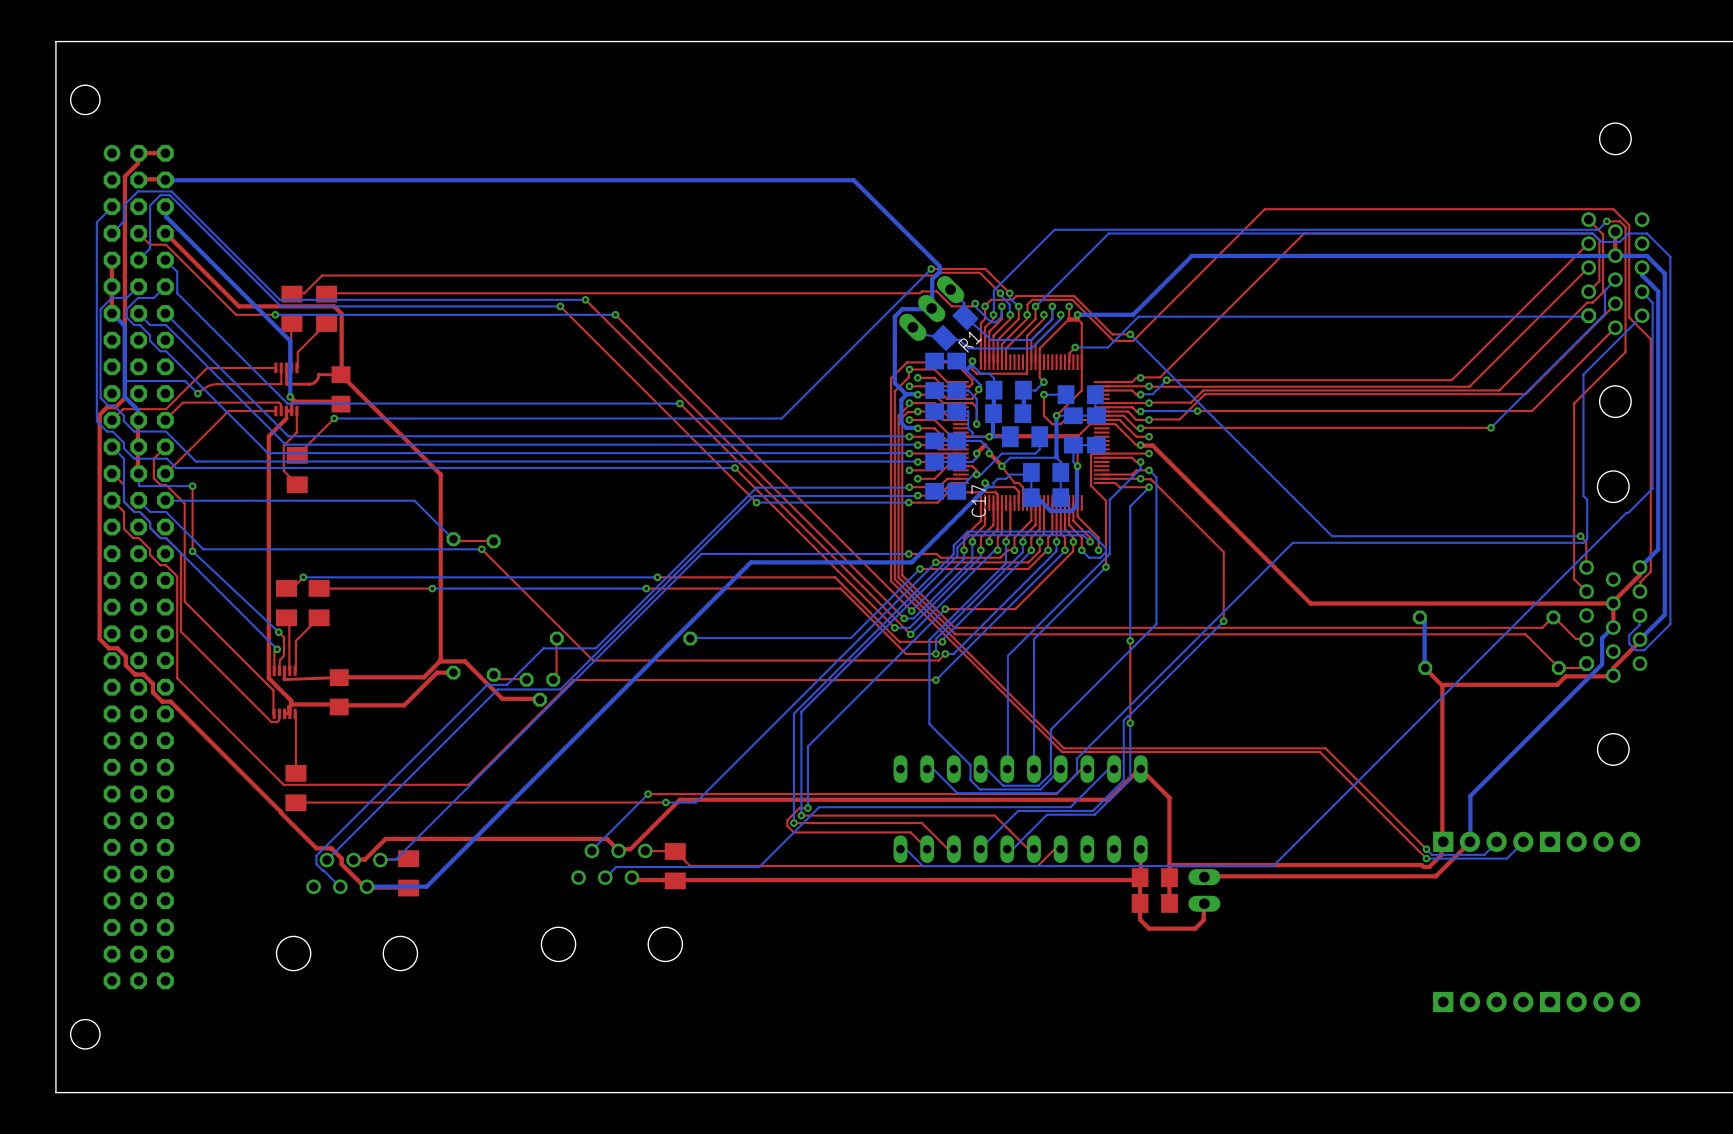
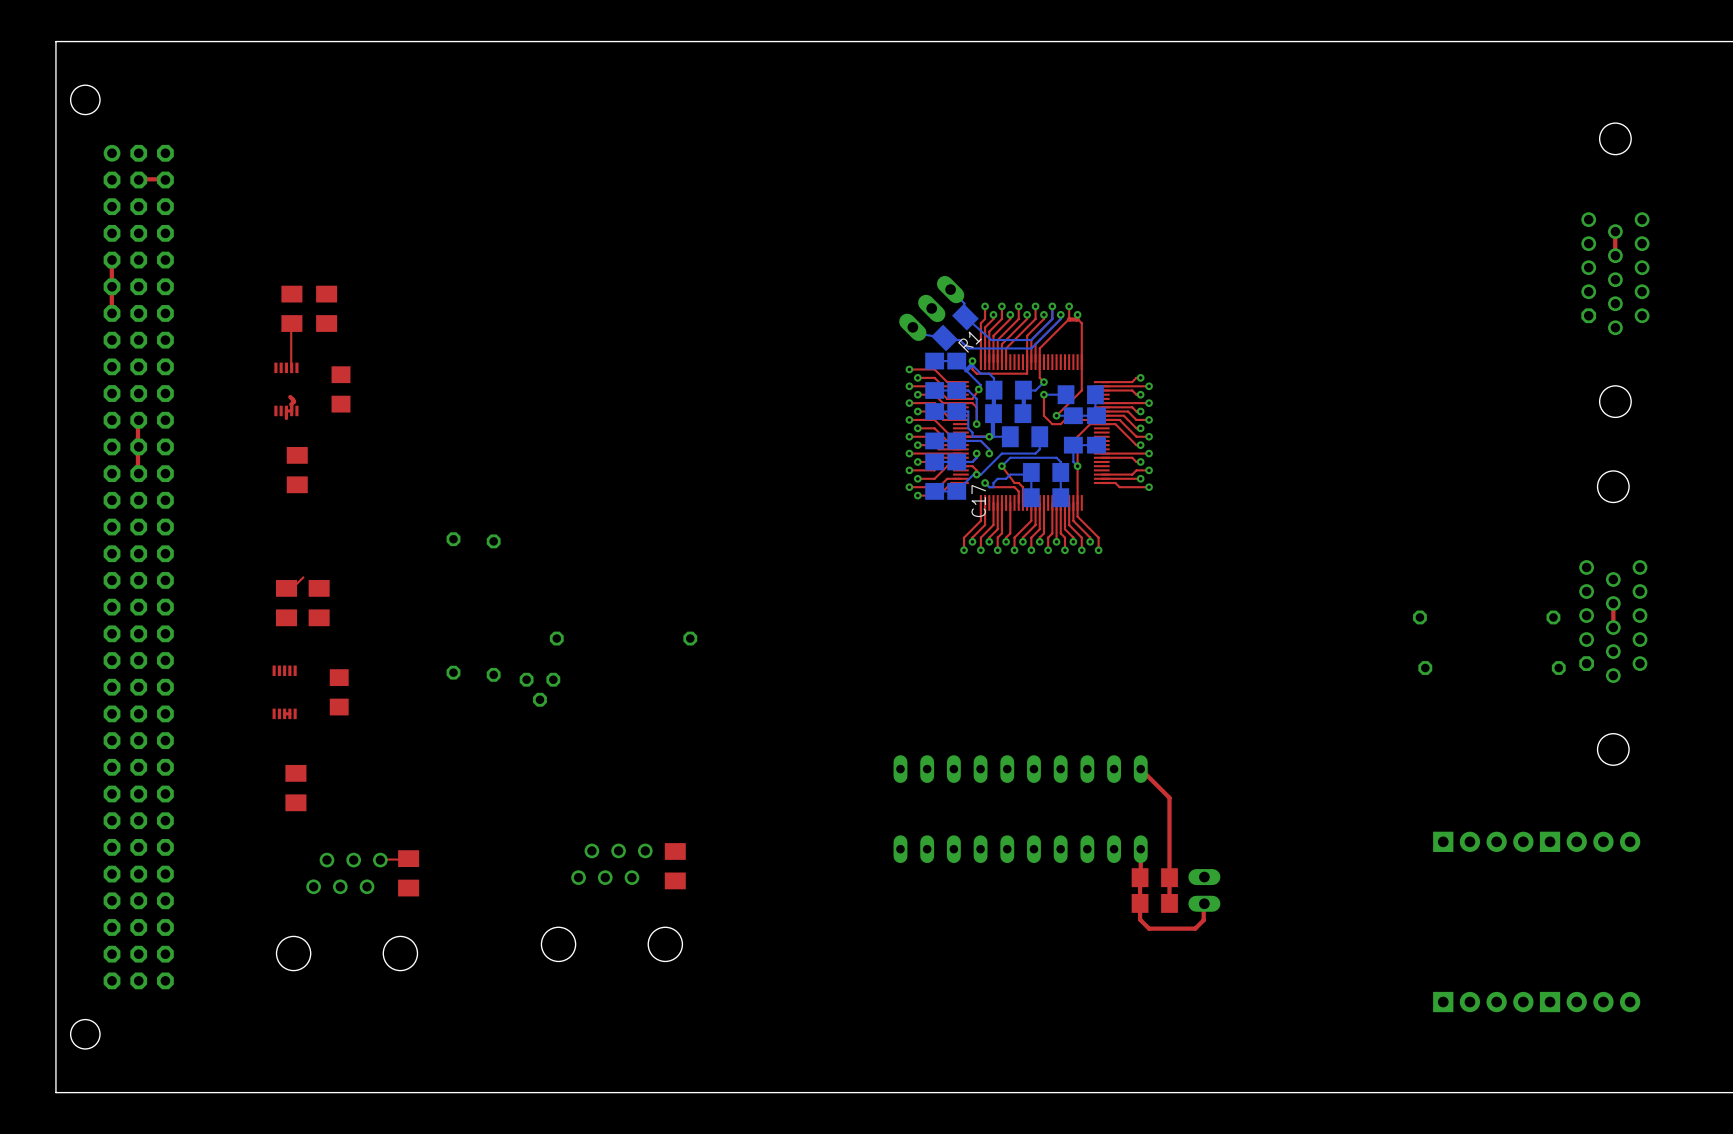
top track: (165, 153) (138, 153) (137, 163) (124, 176) (124, 397) (115, 407) (107, 407) (99, 414) (99, 639) (109, 648) (117, 648) (125, 656) (125, 665) (135, 674) (143, 674) (152, 683) (152, 692) (162, 701) (170, 701) (316, 848) (331, 848) (341, 858) (341, 864) (365, 887) (408, 888) -> none
bottom track: (165, 179) (853, 180) (939, 266) (939, 271) (932, 279) (931, 309) (902, 309) (894, 316) (894, 383) (906, 394) -> none
bottom track: (112, 206) (96, 222) (96, 421) (107, 431) (112, 431) (123, 442) (123, 448) (134, 458) (166, 458) (176, 468) (735, 468) -> none
bottom track: (165, 206) (166, 216) (290, 340) (290, 397) -> none
top track: (1588, 219) (1603, 234) (1603, 292) (1592, 302) (1587, 302) (1499, 390) (1203, 390) (1191, 402) (1149, 403) -> none
top track: (1606, 221) (1619, 221) (1625, 226) (1625, 352) (1574, 403) (1574, 579) (1586, 591) -> none
bottom track: (1606, 221) (1598, 229) (1054, 229) (993, 290) (993, 314) -> none
via: (1606, 221) -> none
bottom track: (112, 233) (123, 221) (123, 205) (137, 191) (171, 191) (280, 299) (585, 299) -> none
top track: (138, 233) (150, 244) (166, 244) (236, 314) (275, 314) -> none
top track: (165, 233) (238, 306) (334, 306) (341, 313) (341, 374) -> none
top track: (1588, 243) (1451, 380) (1166, 380) -> none
bottom track: (138, 260) (150, 248) (150, 205) (160, 195) (169, 195) (280, 306) (560, 306) -> none
bottom track: (165, 260) (177, 271) (177, 293) (287, 403) (679, 403) -> none
top track: (1588, 267) (1469, 386) (1149, 386) -> none
bottom track: (1642, 267) (1642, 275) (1658, 291) (1658, 549) (1640, 567) -> none
top track: (931, 269) (985, 269) (1009, 293) -> none
bottom track: (931, 269) (781, 418) (334, 418) -> none
via: (931, 269) -> none
bottom track: (1615, 279) (1604, 290) (1604, 313) (1490, 427) -> none
bottom track: (138, 286) (126, 297) (111, 297) (100, 309) (100, 397) (108, 405) (113, 405) (123, 415) (123, 421) (134, 431) (166, 431) (195, 461) (917, 461) -> none
bottom track: (165, 286) (153, 297) (137, 297) (126, 309) (126, 317) (134, 325) (139, 325) (150, 335) (150, 340) (160, 351) (166, 351) (267, 453) (909, 453) -> none
top track: (1588, 291) (1599, 281) (1599, 240) (1592, 233) (1304, 233) (1160, 377) (1140, 377) -> none
bottom track: (1642, 291) (1652, 302) (1652, 488) (1273, 866) (922, 866) (906, 849) (900, 849) -> none
top track: (1000, 293) (979, 272) (940, 272) (937, 275) (322, 275) (304, 293) (291, 294) -> none
bottom track: (1000, 293) (1009, 304) (1010, 314) -> none
via: (1000, 293) -> none
bottom track: (1009, 293) (1009, 297) (1018, 306) -> none
via: (1009, 293) -> none
top track: (326, 294) (920, 293) (921, 291) (936, 291) (951, 306) (972, 306) (975, 303) -> none
top track: (585, 299) (904, 618) -> none
via: (585, 299) -> none
bottom track: (975, 303) (975, 306) (991, 322) (995, 322) (1001, 316) (1001, 306) -> none
via: (975, 303) -> none
top track: (1615, 303) (1525, 394) (1205, 394) (1179, 419) (1149, 419) -> none
top track: (560, 306) (756, 502) -> none
via: (560, 306) -> none
top track: (985, 306) (991, 299) (1012, 299) (1016, 296) (1074, 296) (1112, 334) (1130, 334) -> none
bottom track: (1035, 306) (1108, 233) (1592, 233) (1601, 241) (1619, 241) (1628, 233) (1647, 233) (1670, 256) (1670, 624) (1644, 650) (1635, 650) (1629, 643) (1629, 635) (1639, 625) (1640, 615) -> none
bottom track: (112, 313) (124, 326) (124, 397) (137, 410) (138, 420) -> none
bottom track: (138, 313) (150, 325) (166, 325) (285, 444) (917, 445) -> none
bottom track: (165, 313) (288, 436) (909, 436) -> none
via: (275, 314) -> none
top track: (615, 314) (911, 610) -> none
bottom track: (615, 314) (275, 314) -> none
via: (615, 314) -> none
top track: (1027, 314) (1027, 304) (1032, 299) (1072, 299) (1113, 340) (1133, 340) (1264, 209) (1613, 209) (1629, 225) (1629, 317) (1650, 339) (1650, 571) (1640, 582) (1640, 591) -> none
bottom track: (1077, 314) (1133, 314) (1191, 255) (1647, 255) (1664, 273) (1664, 614) (1640, 639) -> none
bottom track: (1588, 315) (1138, 316) (1107, 347) (1075, 347) -> none
bottom track: (1642, 315) (1583, 374) (1583, 496) (1587, 499) (1587, 539) (1583, 542) (1292, 542) (1077, 758) (1077, 773) (1057, 793) (957, 793) (934, 769) (927, 769) -> none
top track: (326, 323) (297, 352) (296, 367) -> none
top track: (1615, 327) (1532, 411) (1197, 411) -> none
bottom track: (1130, 334) (1332, 536) (1580, 536) -> none
via: (1130, 334) -> none
top track: (1075, 347) (1069, 353) (1069, 362) -> none
via: (1075, 347) -> none
top track: (275, 367) (207, 368) (166, 409) (123, 409) (112, 420) -> none
top track: (281, 367) (281, 384) (214, 384) (207, 386) (197, 393) -> none
top track: (286, 367) (286, 384) (310, 384) (316, 380) (318, 374) (341, 374) -> none
top track: (909, 369) (908, 377) (894, 391) (894, 579) (1063, 748) (1325, 748) (1426, 849) -> none
top track: (341, 374) (440, 474) (439, 661) -> none
bottom track: (1166, 380) (1152, 394) (1140, 394) -> none
via: (1166, 380) -> none
bottom track: (124, 381) (185, 381) (197, 393) -> none
top track: (960, 386) (969, 386) (972, 380) (954, 362) (906, 362) (891, 378) (891, 581) (1062, 752) (1319, 752) (1426, 858) -> none
via: (197, 393) -> none
bottom track: (906, 394) (917, 394) -> none
bottom track: (906, 394) (901, 399) (901, 423) (906, 427) (917, 428) -> none
via: (290, 397) -> none
top track: (294, 401) (338, 401) (341, 404) -> none
top track: (679, 403) (910, 634) -> none
via: (679, 403) -> none
top track: (909, 403) (898, 415) (898, 577) (955, 634) (1525, 634) (1558, 668) (1582, 667) (1586, 663) -> none
top track: (275, 410) (228, 411) (165, 473) -> none
top track: (281, 410) (279, 402) (182, 402) (165, 420) -> none
top track: (296, 411) (296, 432) (283, 445) (283, 470) (297, 484) -> none
top track: (917, 411) (907, 411) (902, 417) (902, 575) (954, 627) (1542, 627) (1553, 617) (1576, 639) (1586, 639) -> none
bottom track: (1197, 411) (1140, 411) -> none
via: (1197, 411) -> none
bottom track: (1056, 415) (1056, 457) -> none
top track: (286, 418) (268, 436) (268, 678) (291, 700) (292, 704) -> none
top track: (334, 418) (297, 455) -> none
via: (334, 418) -> none
top track: (1490, 427) (1140, 428) -> none
via: (1490, 427) -> none
top track: (1077, 436) (989, 436) -> none
top track: (985, 445) (976, 453) -> none
top track: (1140, 445) (1152, 445) (1310, 603) (1613, 603) (1639, 575) (1640, 567) -> none
bottom track: (112, 446) (123, 458) (123, 501) (134, 511) (139, 511) (150, 522) (150, 527) (160, 538) (166, 538) (277, 649) -> none
top track: (165, 446) (153, 458) (153, 478) (160, 484) (166, 484) (184, 503) (184, 601) (273, 690) (274, 713) -> none
top track: (989, 453) (1001, 466) -> none
top track: (1101, 453) (1091, 454) (1091, 485) (1106, 500) (1106, 567) -> none
bottom track: (1140, 461) (1140, 468) (1109, 499) (1109, 553) (1007, 655) (1007, 769) -> none
bottom track: (1077, 466) (1077, 505) (1071, 511) (1050, 511) (1037, 497) (1031, 497) -> none
top track: (735, 468) (894, 627) -> none
via: (735, 468) -> none
bottom track: (1149, 470) (1156, 477) (1156, 624) (1050, 729) (1050, 773) (1038, 785) (1003, 785) (987, 769) (980, 769) -> none
top track: (112, 473) (123, 484) (123, 501) (134, 511) (139, 511) (150, 522) (150, 527) (160, 538) (166, 538) (180, 553) (180, 631) (271, 722) (279, 720) (279, 713) -> none
bottom track: (138, 473) (138, 486) (192, 486) -> none
top track: (1140, 478) (1150, 479) (1223, 552) (1223, 621) -> none
bottom track: (988, 485) (911, 562) (750, 562) (426, 886) (367, 886) -> none
top track: (192, 486) (192, 551) -> none
via: (192, 486) -> none
bottom track: (909, 487) (756, 487) (595, 648) (543, 648) (507, 684) (487, 684) (316, 855) (316, 864) (340, 886) -> none
bottom track: (1149, 487) (1130, 506) (1130, 640) -> none
bottom track: (917, 495) (753, 496) (560, 689) (497, 689) (326, 860) -> none
top track: (112, 500) (123, 511) (123, 528) (133, 538) (138, 538) (150, 549) (150, 554) (160, 565) (166, 565) (177, 576) (177, 678) (283, 784) (468, 784) (573, 680) (935, 680) -> none
bottom track: (138, 500) (150, 511) (166, 511) (203, 549) (481, 549) -> none
bottom track: (165, 500) (414, 500) (453, 539) -> none
via: (756, 502) -> none
top track: (908, 502) (937, 502) (948, 492) (995, 492) (997, 502) -> none
bottom track: (908, 502) (756, 502) -> none
via: (908, 502) -> none
top track: (1580, 536) (1586, 541) (1586, 567) -> none
via: (1580, 536) -> none
top track: (453, 539) (454, 540) (493, 541) -> none
bottom track: (972, 541) (972, 559) (913, 618) (904, 618) -> none
bottom track: (1006, 541) (1006, 563) (929, 639) (929, 724) (970, 765) (970, 780) (979, 789) (1040, 789) (1060, 769) -> none
bottom track: (1022, 541) (1022, 552) (935, 639) (935, 653) -> none
top track: (1039, 541) (1039, 551) (1028, 562) (935, 562) -> none
bottom track: (1056, 541) (1056, 551) (953, 653) (945, 653) -> none
top track: (1073, 541) (1073, 551) (1015, 609) (945, 609) -> none
bottom track: (1090, 541) (1083, 535) (969, 535) (957, 547) (957, 555) (801, 711) (801, 815) -> none
top track: (481, 549) (593, 660) (938, 660) (945, 653) -> none
via: (481, 549) -> none
bottom track: (964, 550) (963, 558) (911, 610) -> none
bottom track: (980, 550) (980, 556) (909, 627) (894, 627) -> none
bottom track: (997, 550) (993, 551) (910, 634) -> none
top track: (1014, 550) (1007, 550) (1000, 557) (940, 557) (936, 553) (908, 553) -> none
bottom track: (1031, 550) (942, 641) -> none
top track: (1048, 550) (1028, 568) (920, 568) -> none
bottom track: (1064, 550) (935, 680) -> none
bottom track: (1081, 550) (1089, 557) (1100, 557) (1106, 552) (1106, 548) (1089, 531) (967, 531) (953, 545) (953, 553) (793, 713) (793, 823) -> none
bottom track: (192, 551) (278, 632) -> none
via: (192, 551) -> none
bottom track: (908, 553) (701, 553) (395, 859) (380, 860) -> none
via: (908, 553) -> none
bottom track: (935, 562) (695, 802) (665, 802) -> none
via: (935, 562) -> none
bottom track: (1106, 567) (1034, 639) (1034, 768) -> none
via: (1106, 567) -> none
bottom track: (920, 568) (850, 638) (690, 638) -> none
via: (920, 568) -> none
via: (303, 577) -> none
top track: (657, 577) (835, 577) (899, 641) (942, 641) -> none
bottom track: (657, 577) (303, 577) -> none
via: (657, 577) -> none
top track: (319, 588) (432, 588) -> none
via: (432, 588) -> none
top track: (646, 588) (840, 588) (906, 653) (935, 653) -> none
bottom track: (646, 588) (432, 588) -> none
via: (646, 588) -> none
bottom track: (945, 609) (807, 746) (807, 808) -> none
via: (945, 609) -> none
via: (911, 610) -> none
top track: (286, 617) (289, 621) (289, 670) -> none
top track: (319, 617) (295, 640) (295, 670) -> none
bottom track: (1419, 617) (1424, 622) (1425, 668) -> none
via: (904, 618) -> none
bottom track: (1223, 621) (1123, 720) (1123, 780) (1092, 810) (1018, 810) (980, 849) -> none
via: (1223, 621) -> none
via: (894, 627) -> none
bottom track: (1613, 627) (1602, 638) (1602, 664) (1470, 796) (1469, 841) -> none
top track: (278, 632) (284, 637) (284, 655) (279, 660) (279, 670) -> none
via: (278, 632) -> none
via: (910, 634) -> none
top track: (556, 638) (556, 676) (553, 679) -> none
top track: (1640, 639) (1613, 667) (1613, 675) -> none
top track: (1130, 640) (1130, 723) -> none
via: (1130, 640) -> none
via: (942, 641) -> none
top track: (277, 649) (274, 652) (274, 670) -> none
via: (277, 649) -> none
via: (935, 653) -> none
via: (945, 653) -> none
top track: (439, 661) (423, 677) (284, 679) (284, 670) -> none
top track: (439, 661) (465, 661) (502, 698) (539, 699) -> none
top track: (1425, 668) (1442, 685) -> none
top track: (453, 672) (436, 672) (404, 705) (340, 705) (339, 707) (337, 704) (292, 704) -> none
top track: (493, 674) (497, 679) (526, 679) -> none
top track: (1613, 675) (1565, 676) (1557, 684) (1442, 685) -> none
via: (935, 680) -> none
top track: (1442, 685) (1443, 841) (1441, 843) (1441, 854) (1429, 867) (1421, 865) (1169, 865) -> none
top track: (292, 704) (289, 707) (289, 713) -> none
top track: (295, 713) (295, 773) -> none
bottom track: (1130, 723) (1130, 779) (1094, 814) (1047, 814) (1013, 848) (1007, 849) -> none
via: (1130, 723) -> none
top track: (1087, 769) (1080, 769) (1056, 794) (648, 794) -> none
bottom track: (1114, 769) (1107, 769) (1070, 807) (819, 807) (759, 867) (616, 867) (605, 877) -> none
top track: (1140, 769) (1108, 799) (679, 799) (630, 849) (618, 850) (607, 838) (385, 838) (365, 859) (353, 860) -> none
bottom track: (648, 794) (591, 850) -> none
via: (648, 794) -> none
top track: (665, 802) (295, 802) -> none
via: (665, 802) -> none
top track: (807, 808) (799, 808) (787, 820) (787, 825) (793, 832) (910, 832) (927, 849) -> none
via: (807, 808) -> none
top track: (801, 815) (994, 815) (1027, 848) (1033, 849) -> none
via: (801, 815) -> none
top track: (793, 823) (921, 823) (947, 848) (953, 849) -> none
via: (793, 823) -> none
top track: (1469, 841) (1435, 876) (1204, 877) -> none
bottom track: (1496, 841) (1484, 854) (1432, 854) (1426, 849) -> none
bottom track: (1523, 841) (1506, 858) (1426, 858) -> none
top track: (1060, 849) (1054, 849) (1037, 866) (690, 866) (675, 851) (645, 851) -> none
via: (1426, 849) -> none
via: (1426, 858) -> none
top track: (1140, 877) (1138, 880) (675, 880) (634, 880) (631, 877) -> none

